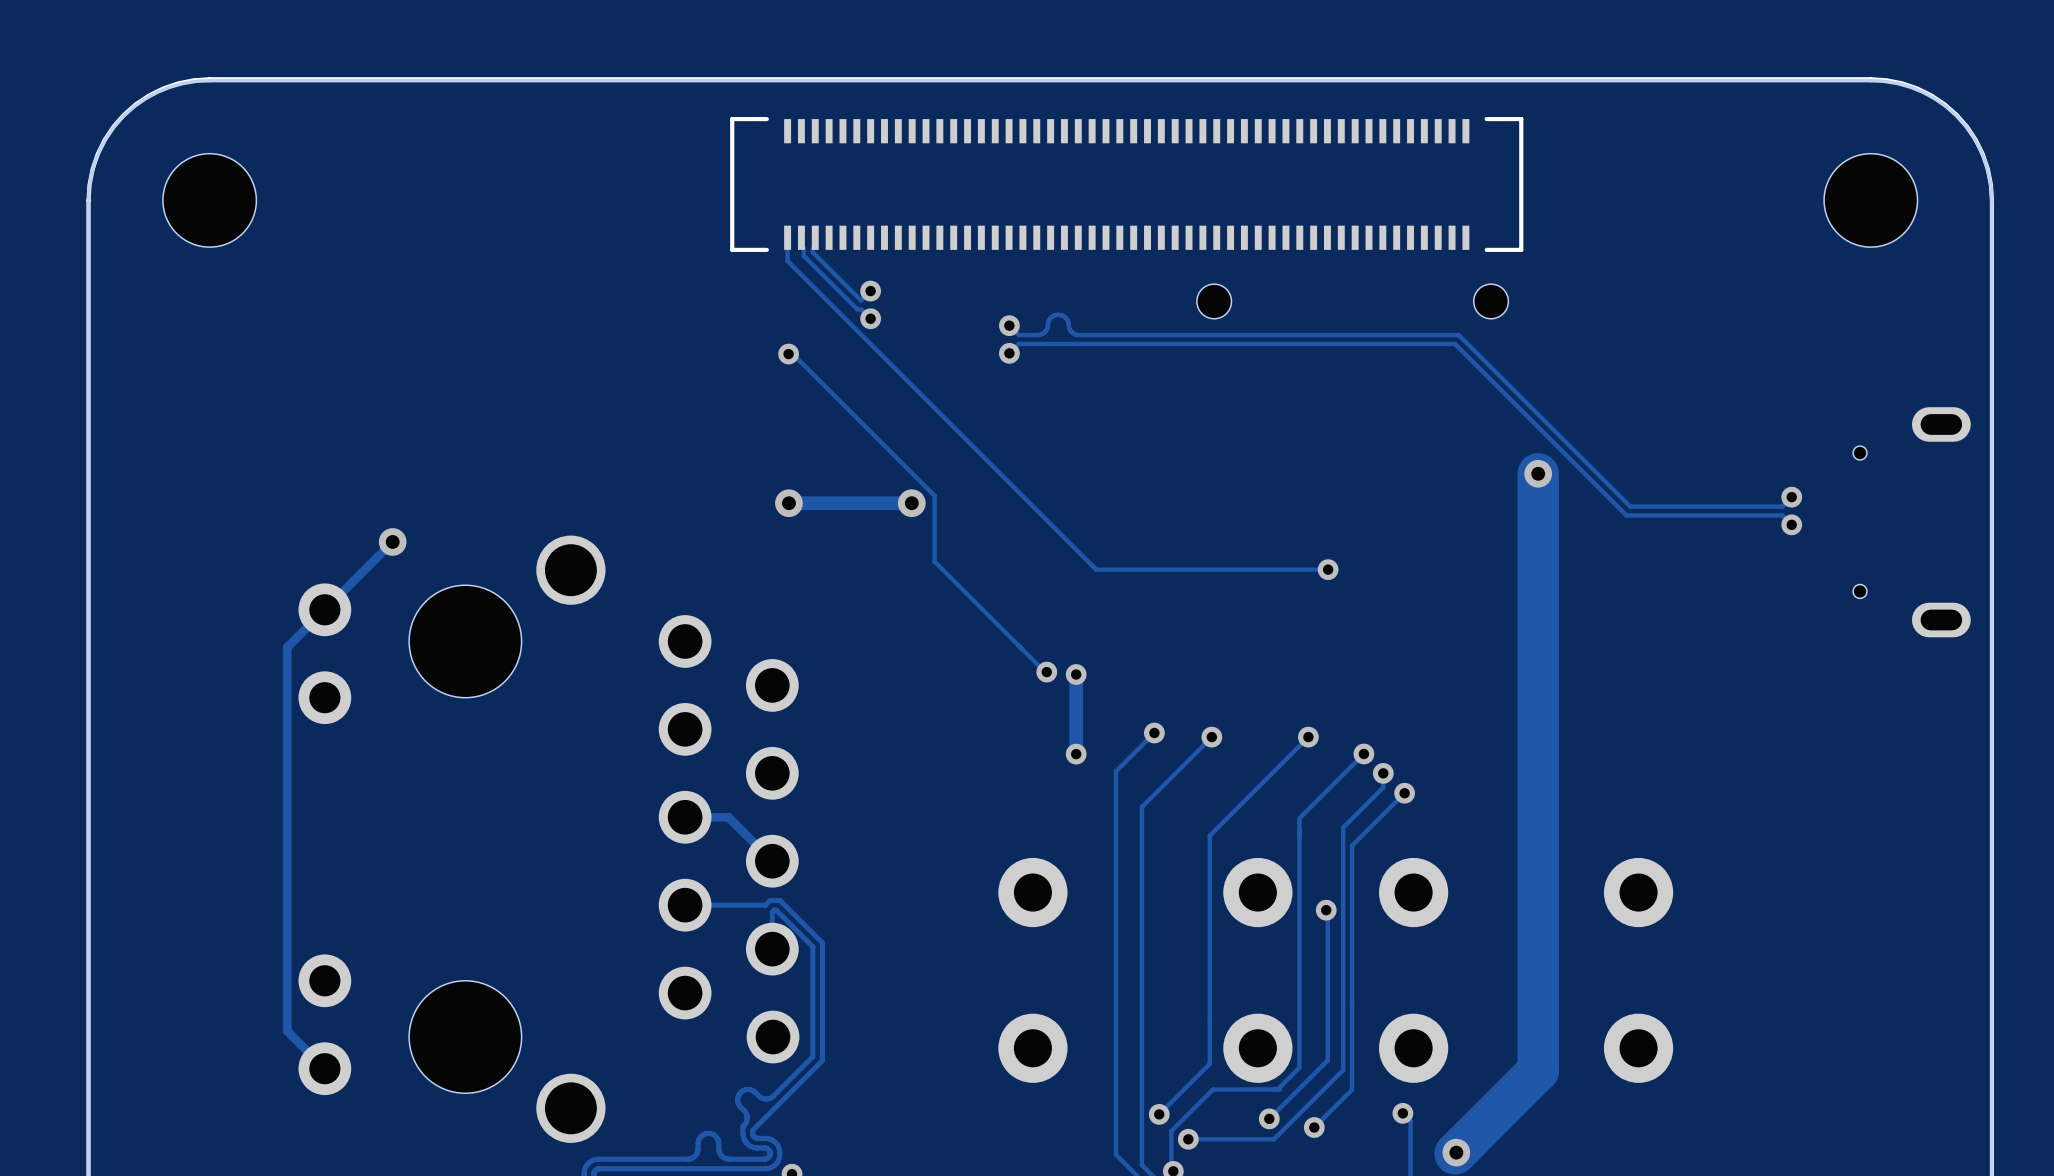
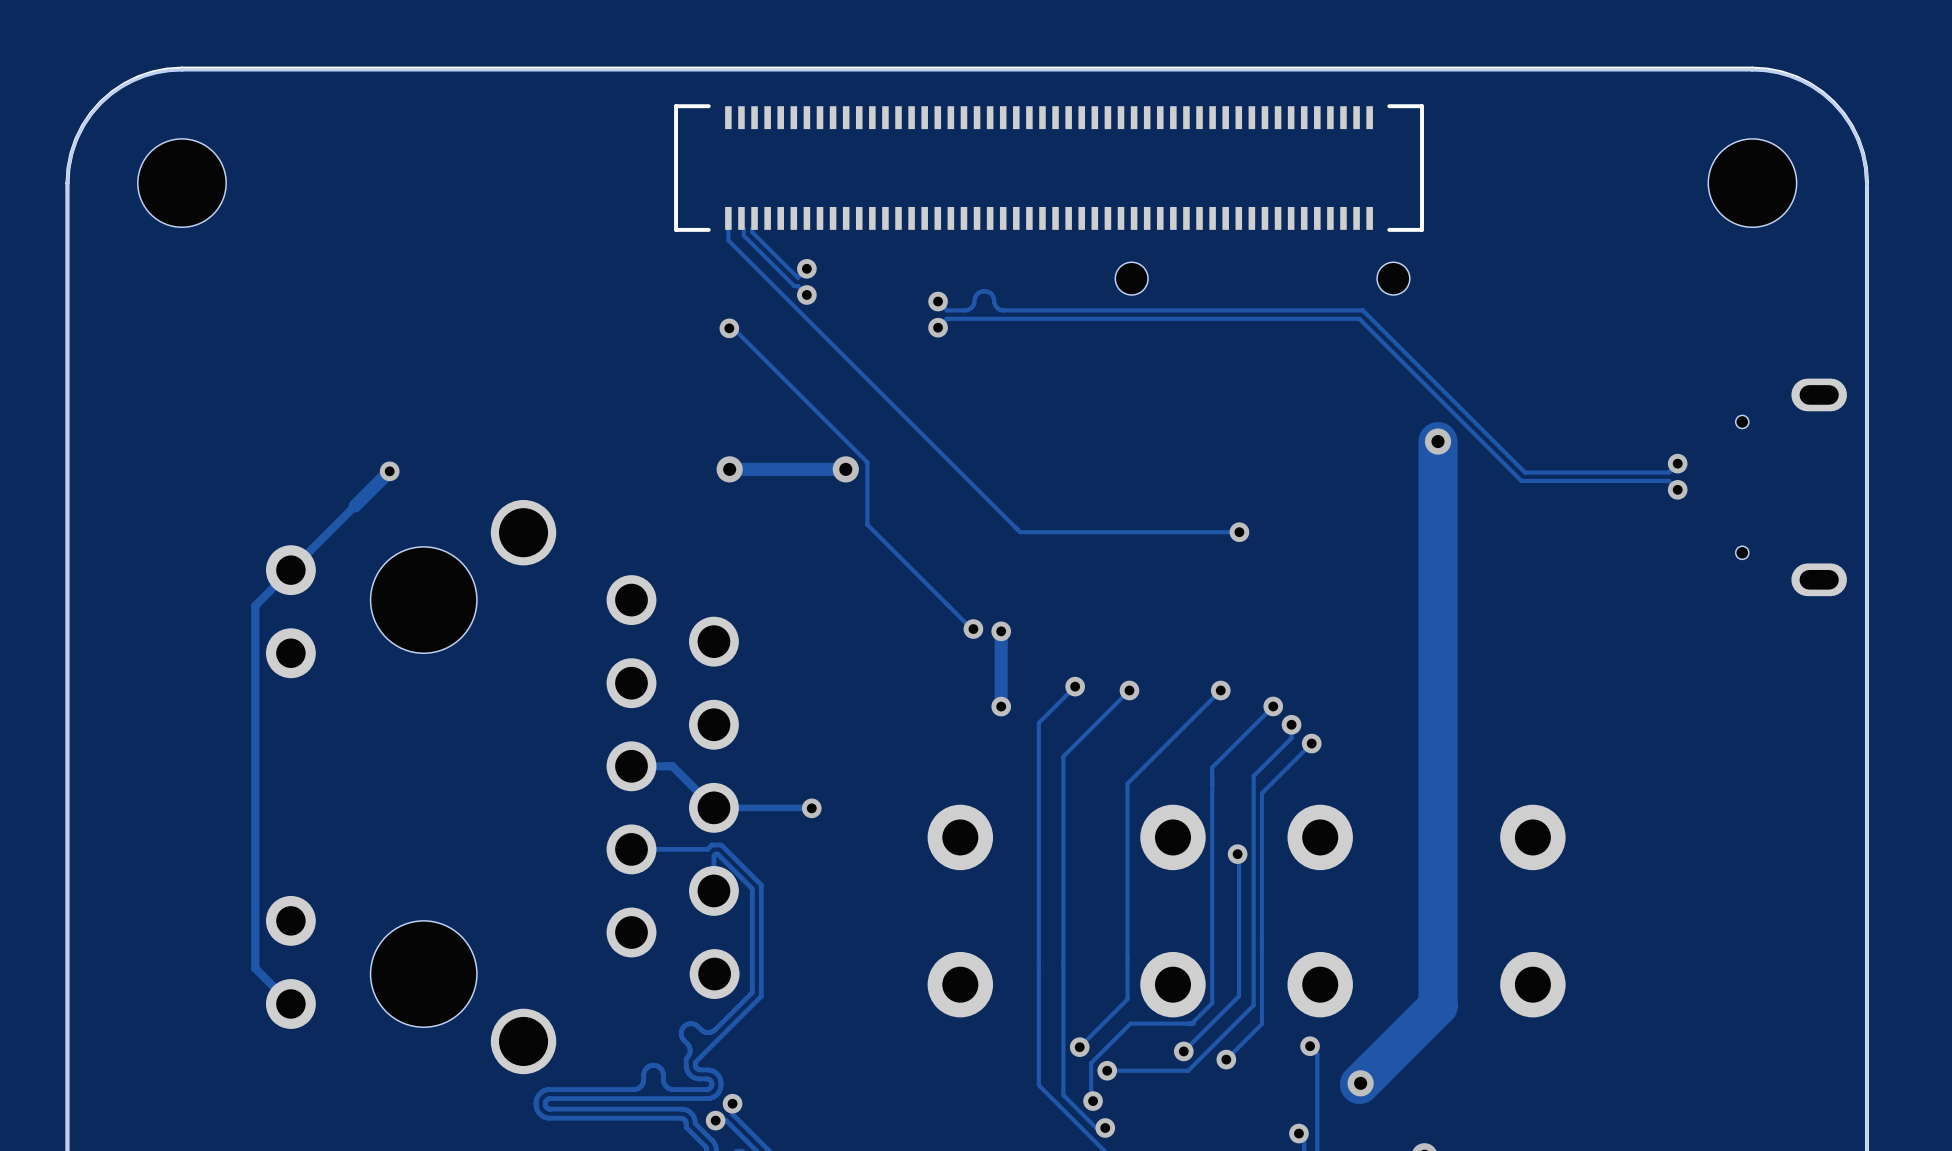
track: none -> (389, 471) (355, 506)
via: none -> (389, 471)
via: (392, 541) -> none
track: none -> (713, 807) (811, 808)
via: none -> (811, 808)

